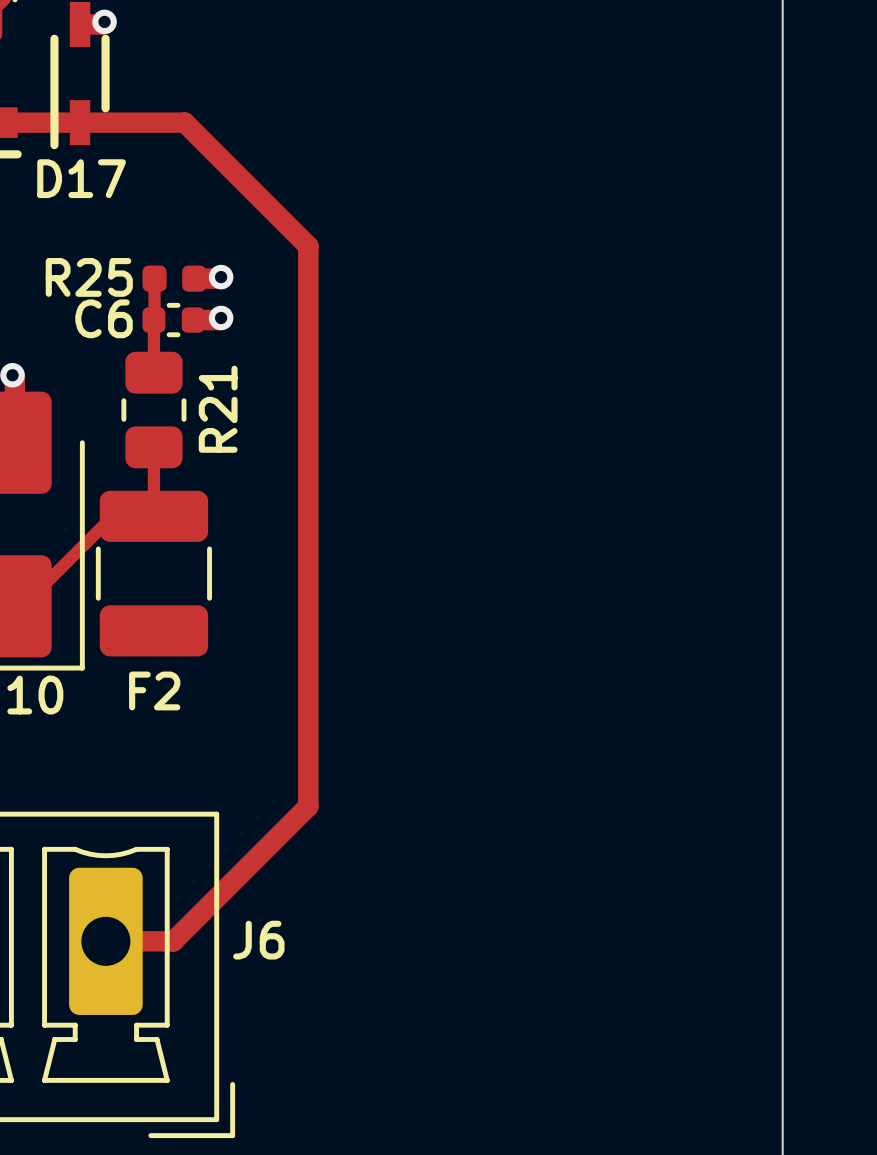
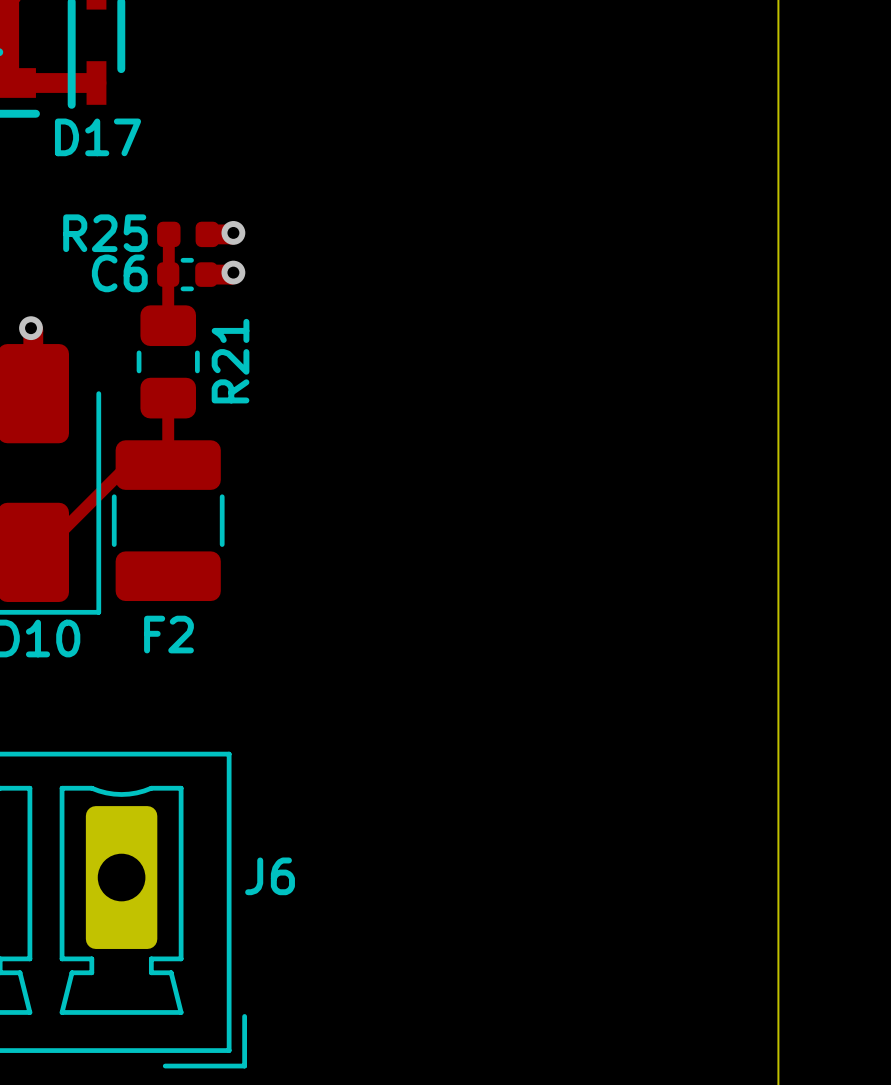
top track: (80, 122) (184, 122) (308, 246) (308, 806) (173, 941) (105, 941) -> none

